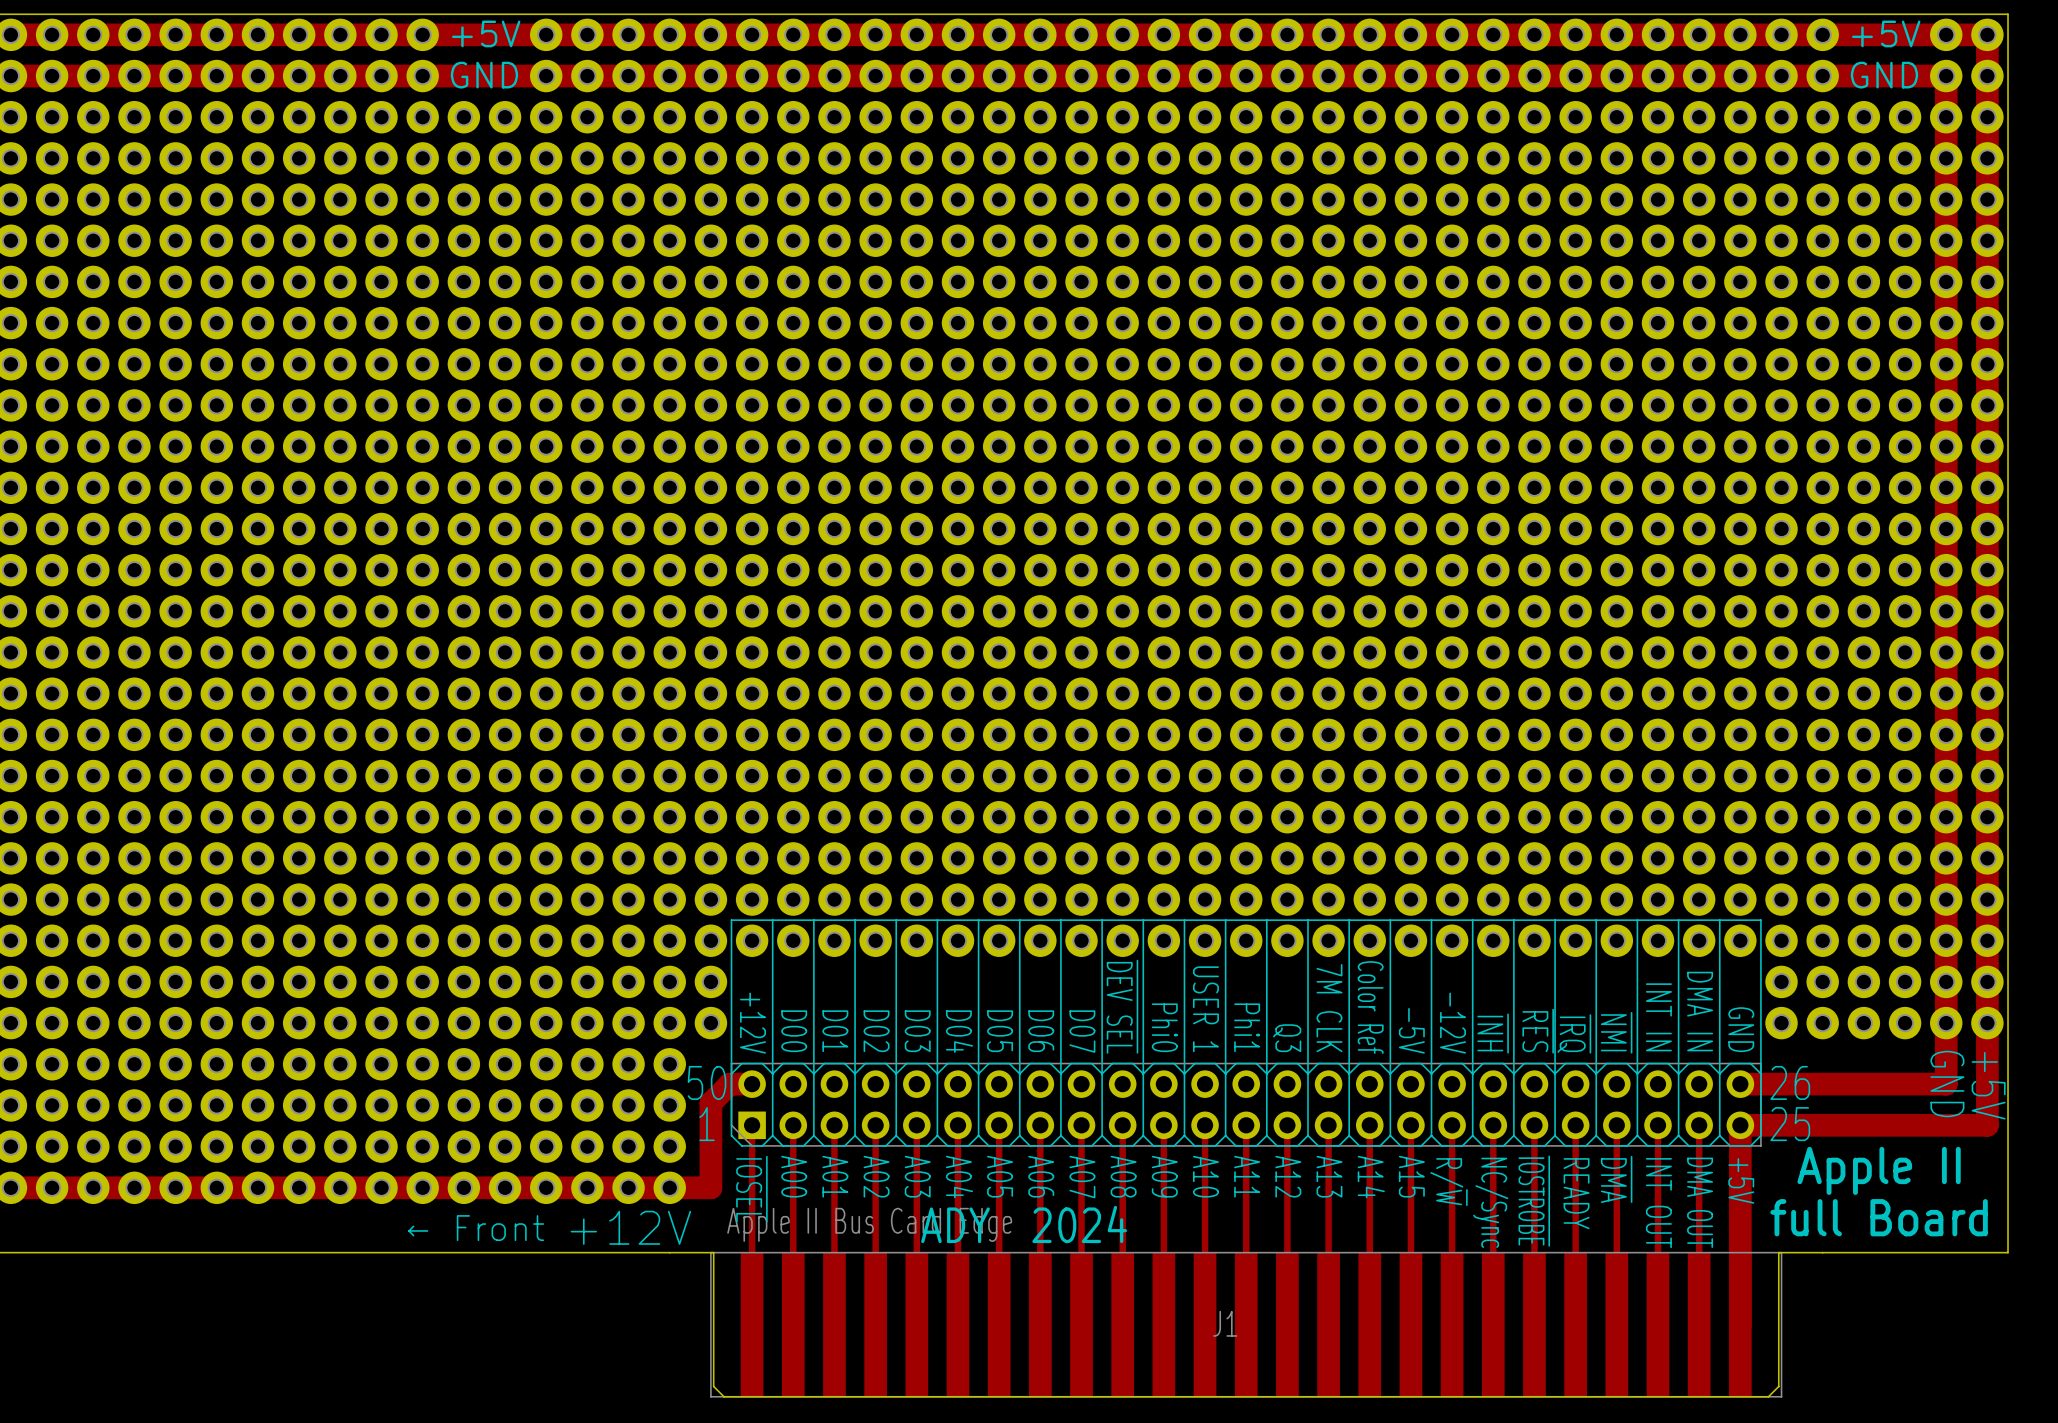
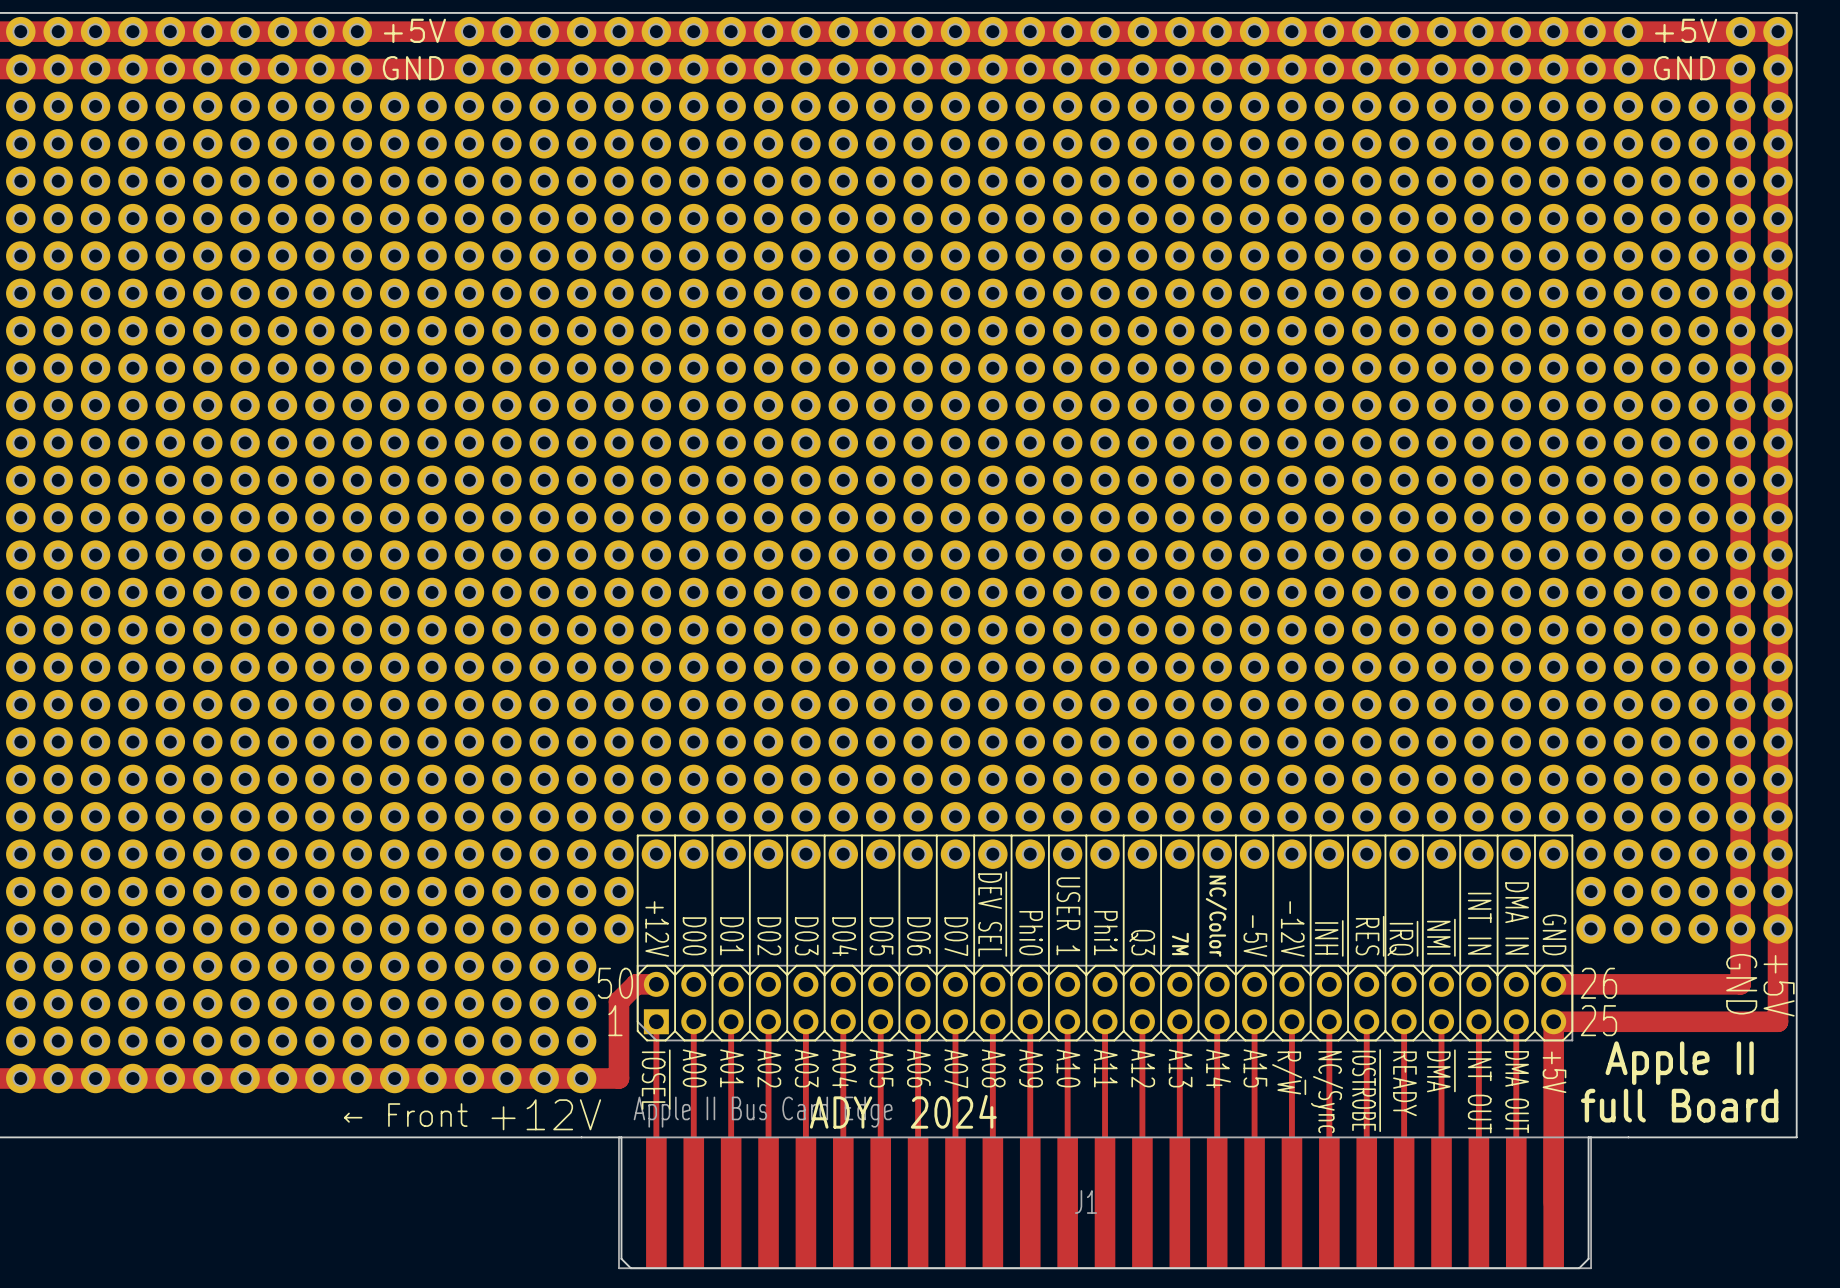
text: Color Ref (1370, 1007) -> NC/Color (1216, 916)
text: 7M CLK (1329, 1008) -> 7M (1180, 943)

